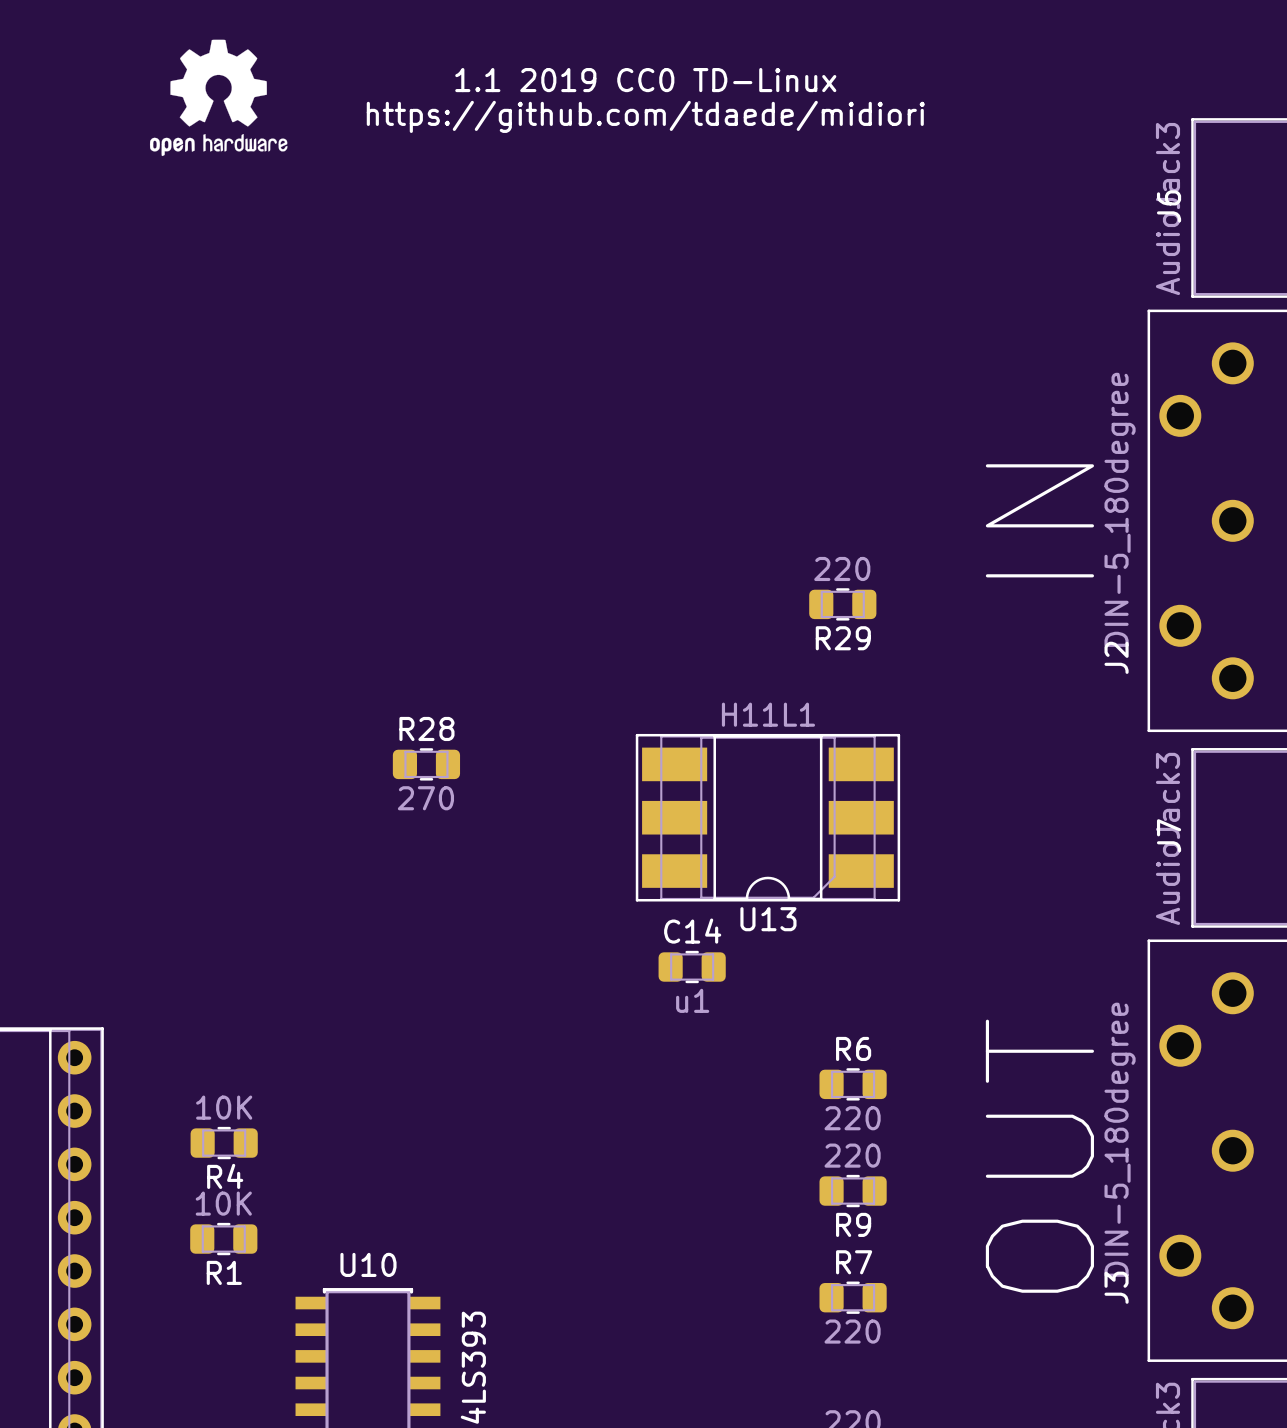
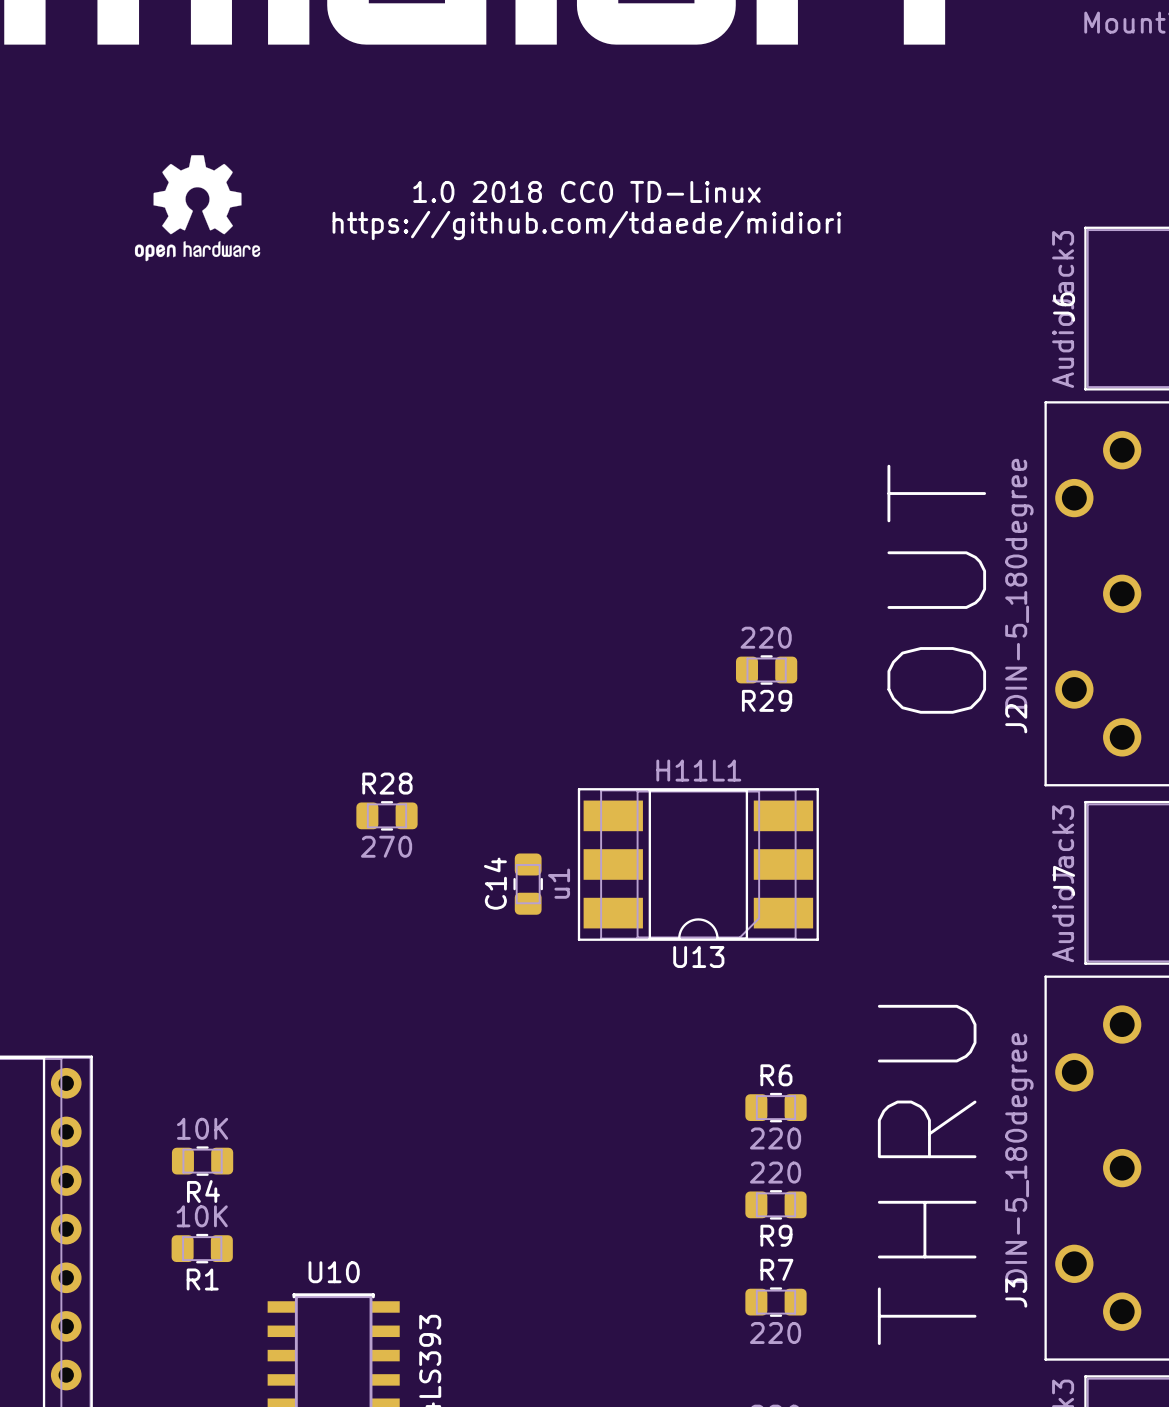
text: 1.1 2019 CC0 TD-Linux (645, 80) -> 1.0 2018 CC0 TD-Linux (586, 191)
text: IN (1039, 520) -> OUT (936, 589)
C14 name position: C14 (692, 931) -> C14 (495, 883)
C14 rotation: 0° (692, 967) -> 90° clockwise (528, 884)
C14 position: (692, 967) -> (528, 884)
C14 value position: u1 (692, 1000) -> u1 (559, 883)
text: OUT (1039, 1156) -> none
text: none -> THRU (927, 1174)

